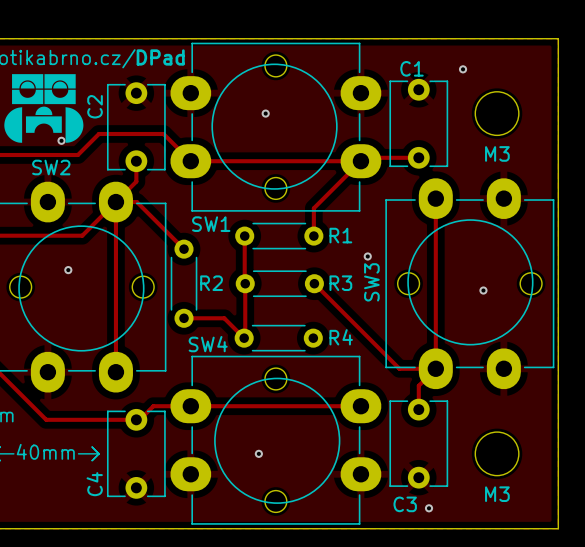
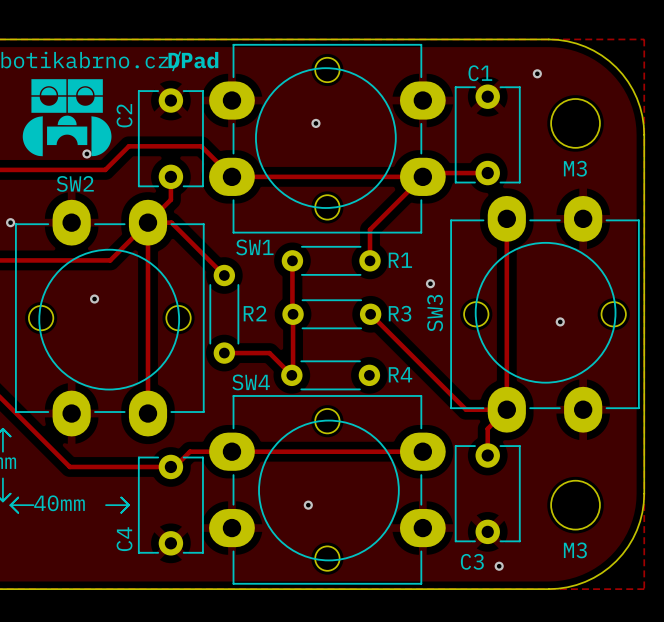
board edge: (473, 38) (558, 38) (558, 123) -> (548, 39) (567, 41) (585, 46) (601, 55) (616, 67) (628, 81) (636, 98) (642, 116) (644, 134)
board edge: (558, 443) (558, 528) (473, 528) -> (644, 493) (642, 512) (636, 530) (628, 546) (616, 561) (601, 573) (585, 581) (567, 587) (548, 589)

